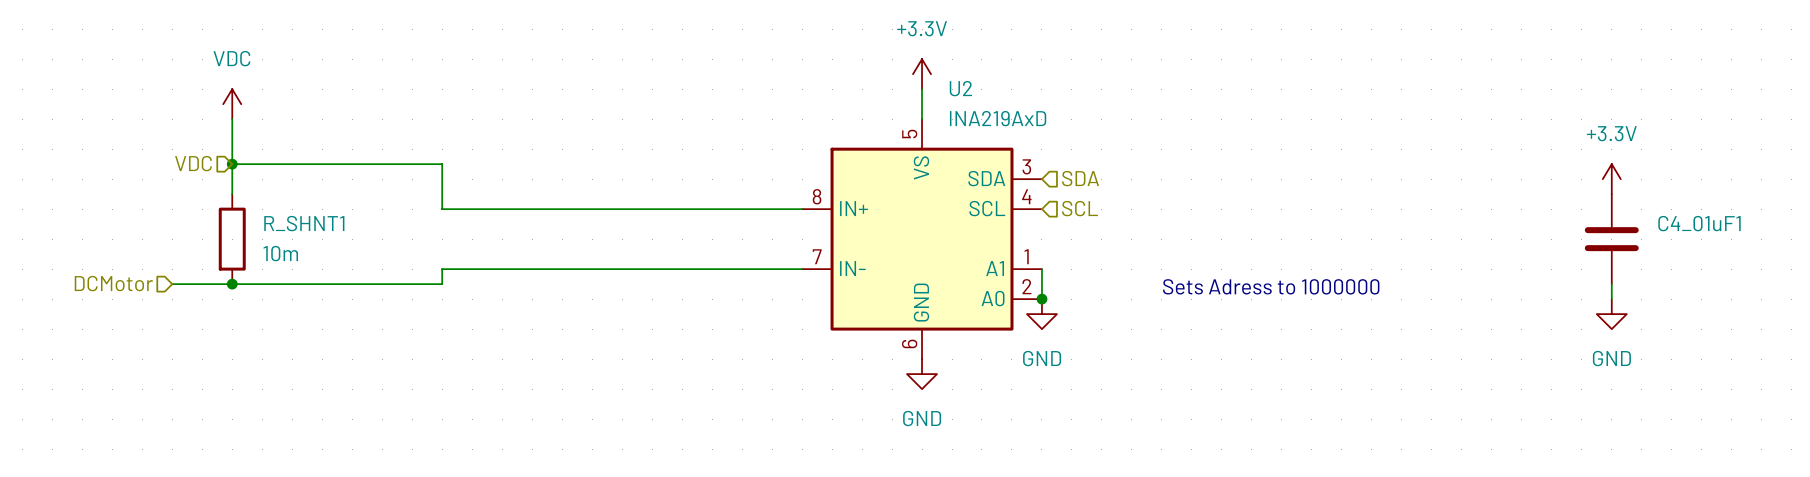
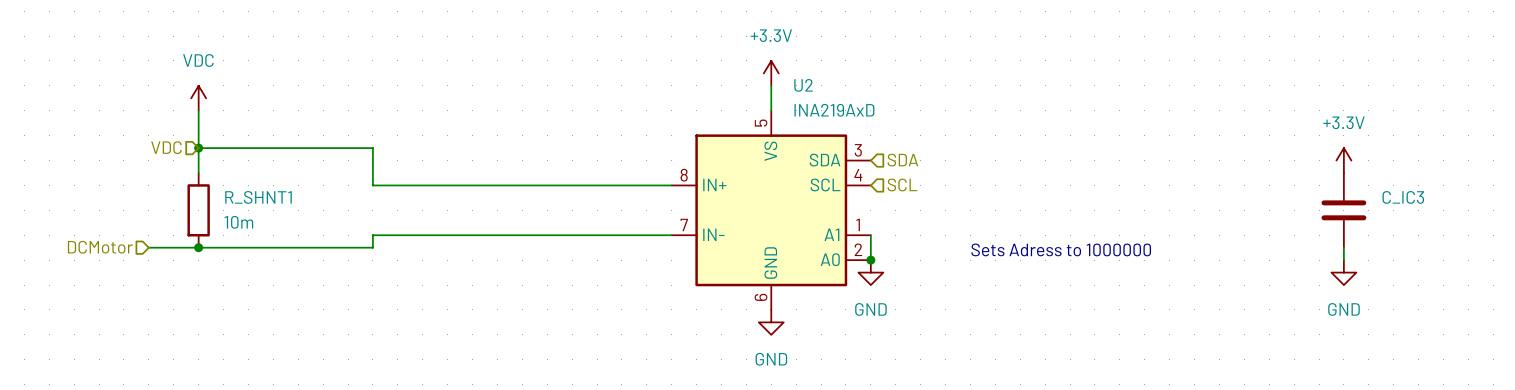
C4_01uF1 name: C4_01uF1 (1699, 223) -> C_IC3 (1403, 197)

